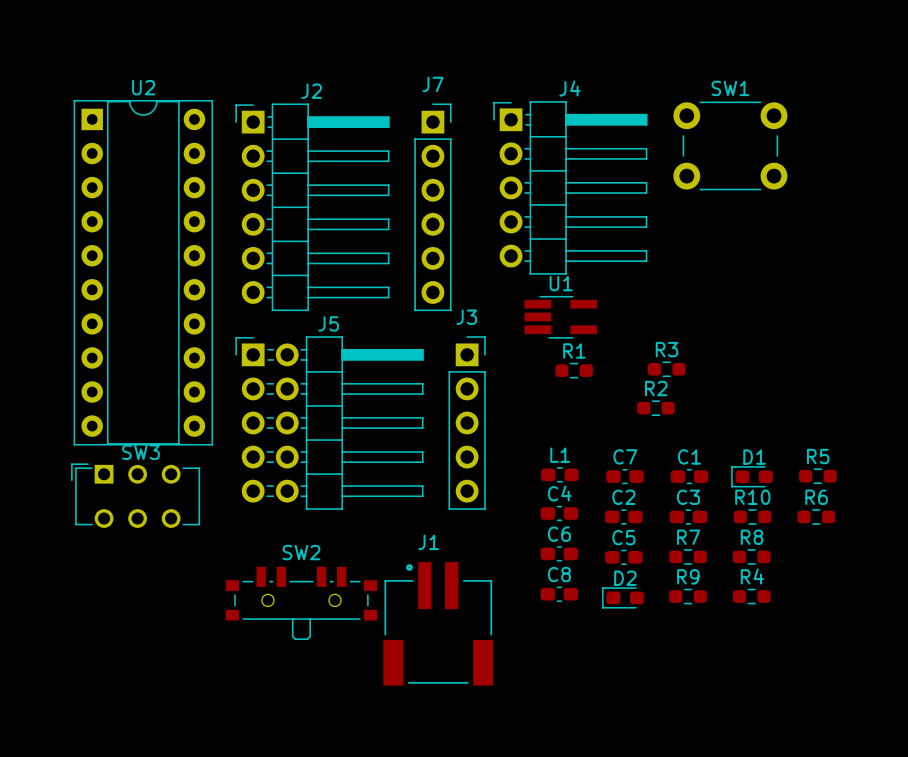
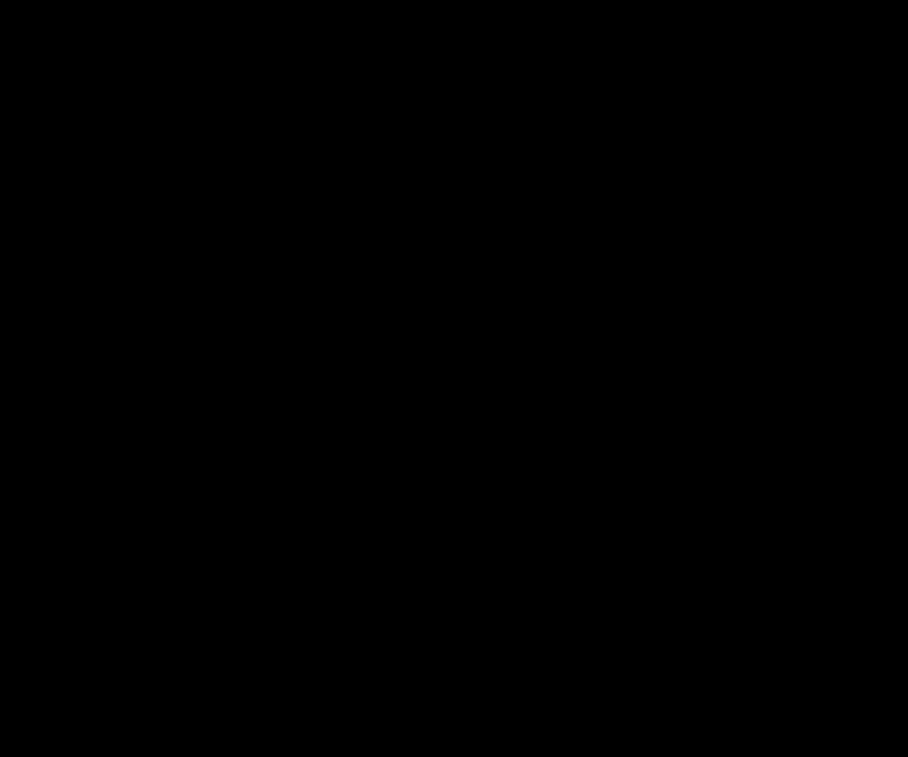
SW1: (730, 145) -> none
J4: (570, 187) -> none
J2: (312, 207) -> none
J7: (432, 207) -> none
U2: (143, 272) -> none
U1: (560, 317) -> none
R3: (666, 369) -> none
R1: (574, 370) -> none
R2: (655, 408) -> none
J5: (329, 423) -> none
J3: (467, 423) -> none
L1: (559, 474) -> none
C7: (624, 476) -> none
C1: (689, 476) -> none
D1: (752, 476) -> none
R5: (817, 476) -> none
SW3: (135, 495) -> none
C4: (559, 513) -> none
C2: (623, 516) -> none
C3: (688, 516) -> none
R10: (752, 516) -> none
R6: (816, 516) -> none
C6: (559, 553) -> none
R7: (688, 556) -> none
R8: (751, 556) -> none
C5: (623, 557) -> none
C8: (559, 594) -> none
R9: (688, 596) -> none
R4: (751, 596) -> none
D2: (622, 597) -> none
SW2: (301, 603) -> none
J1: (438, 623) -> none

